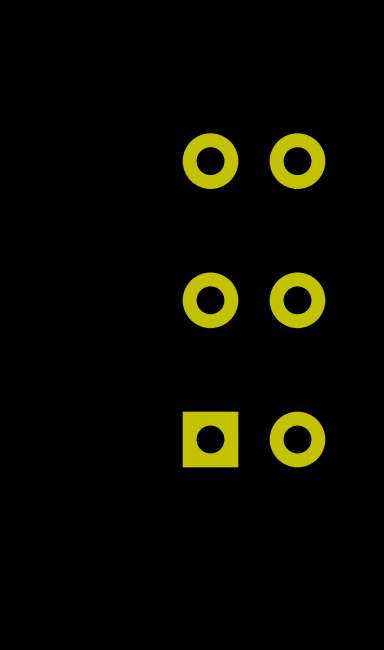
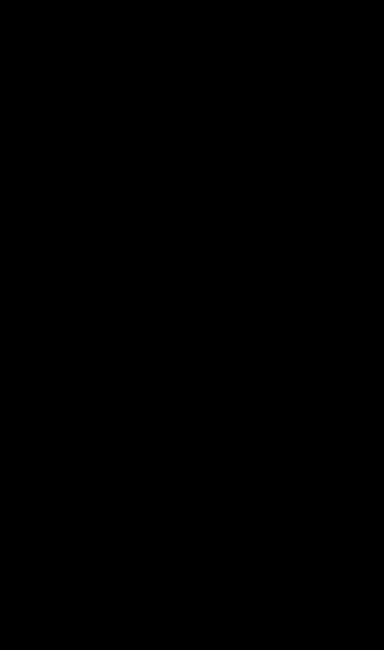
part: (254, 300) -> none

